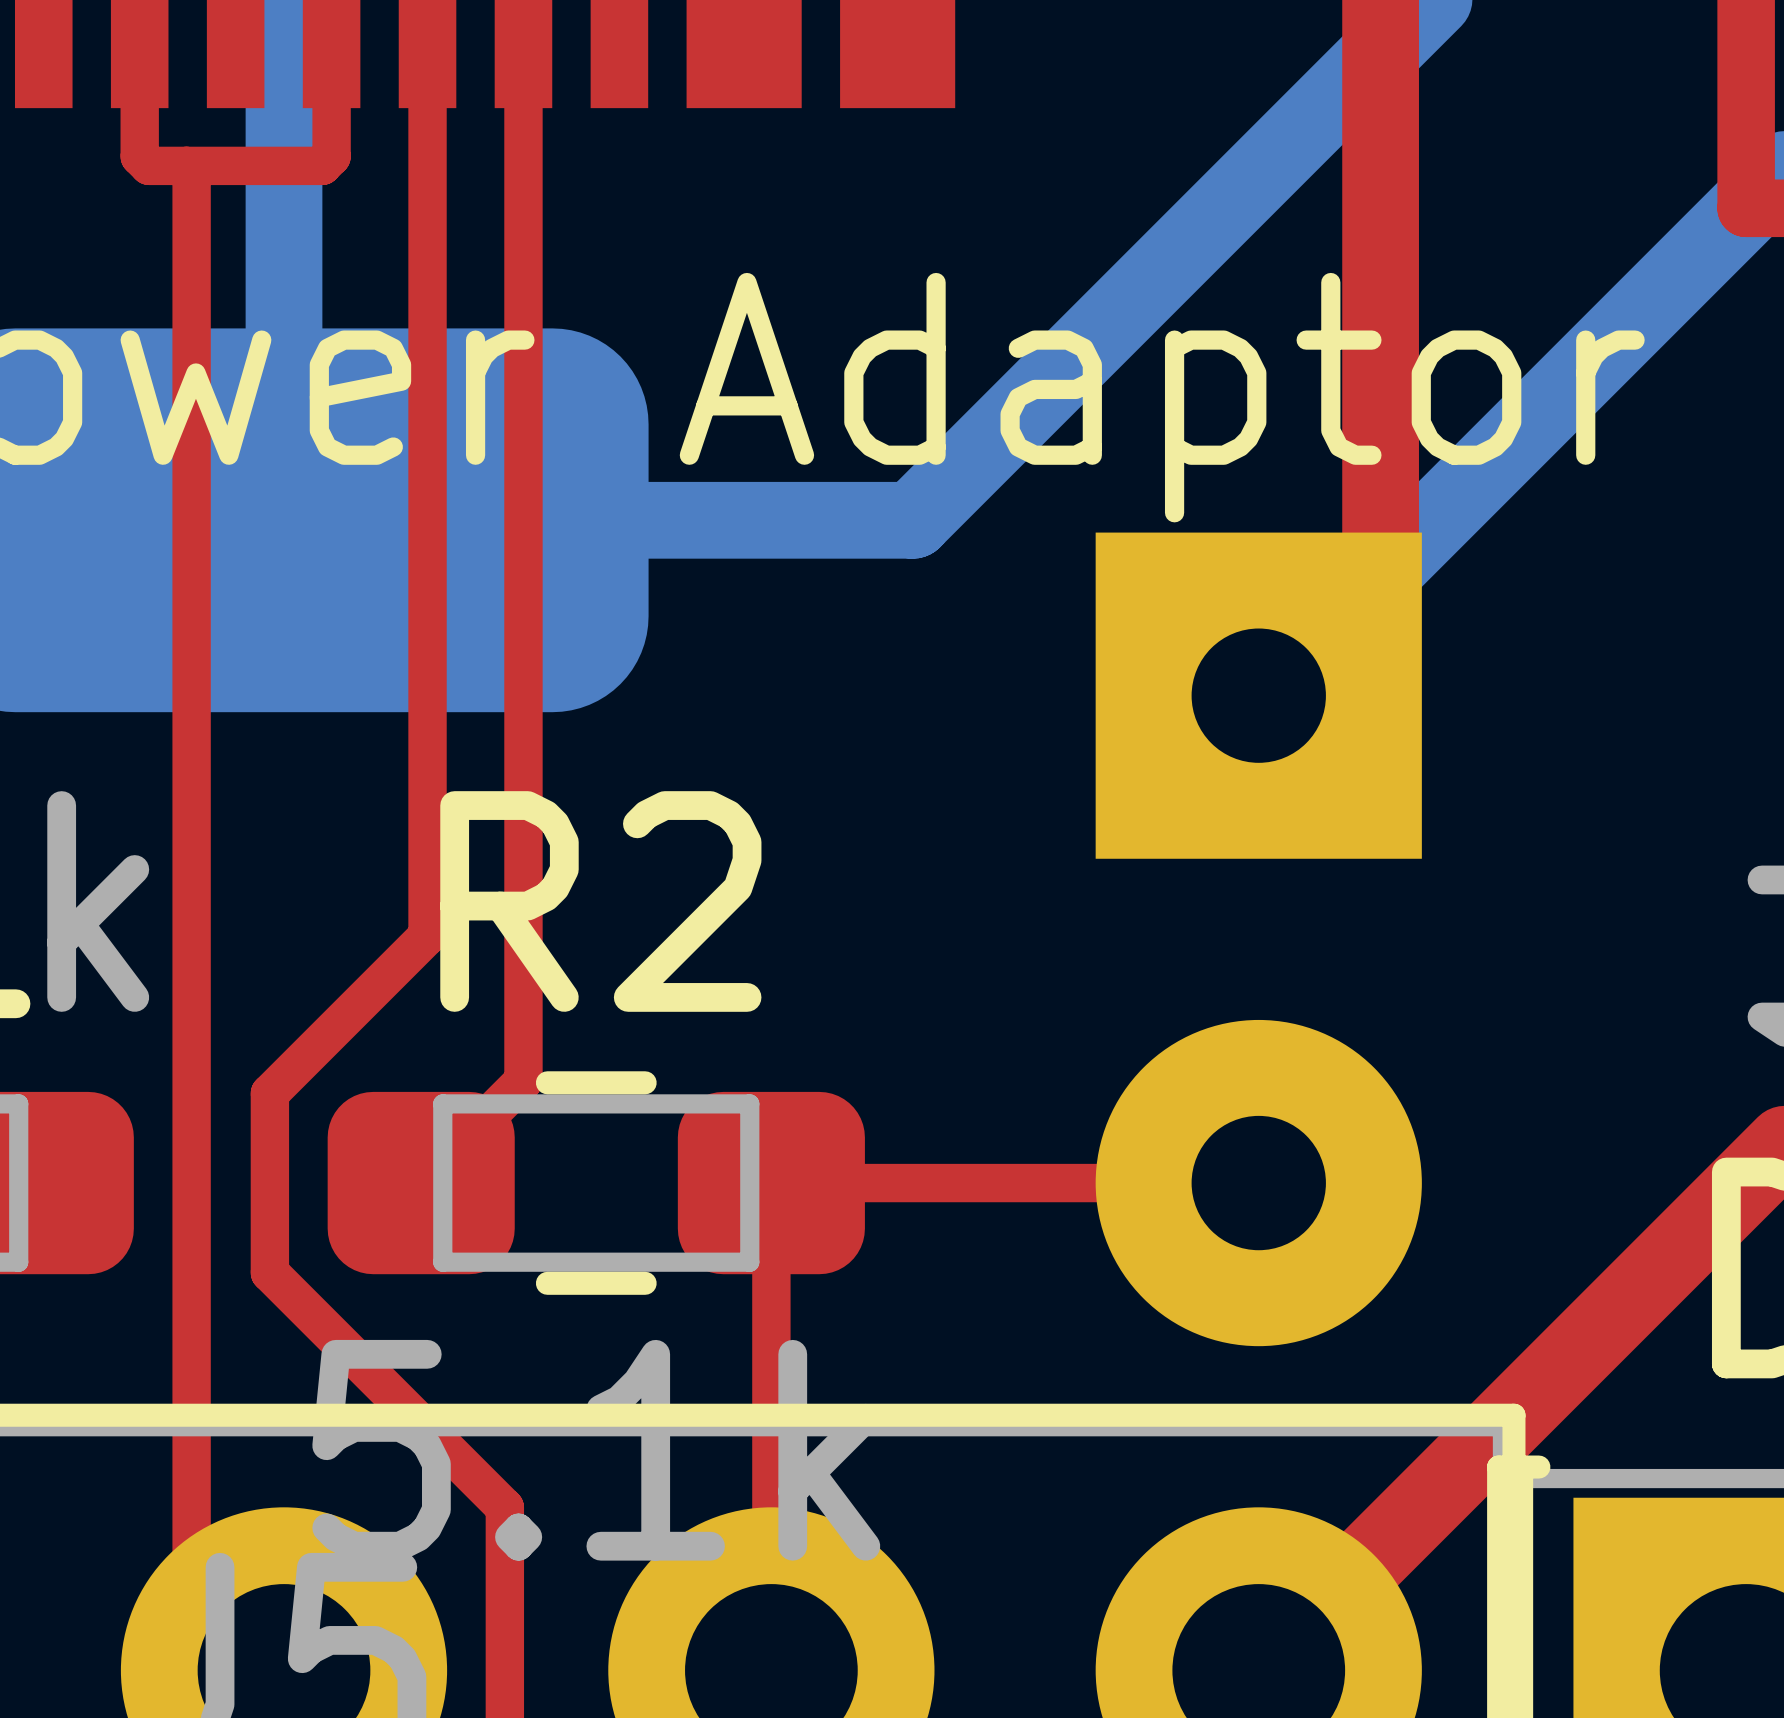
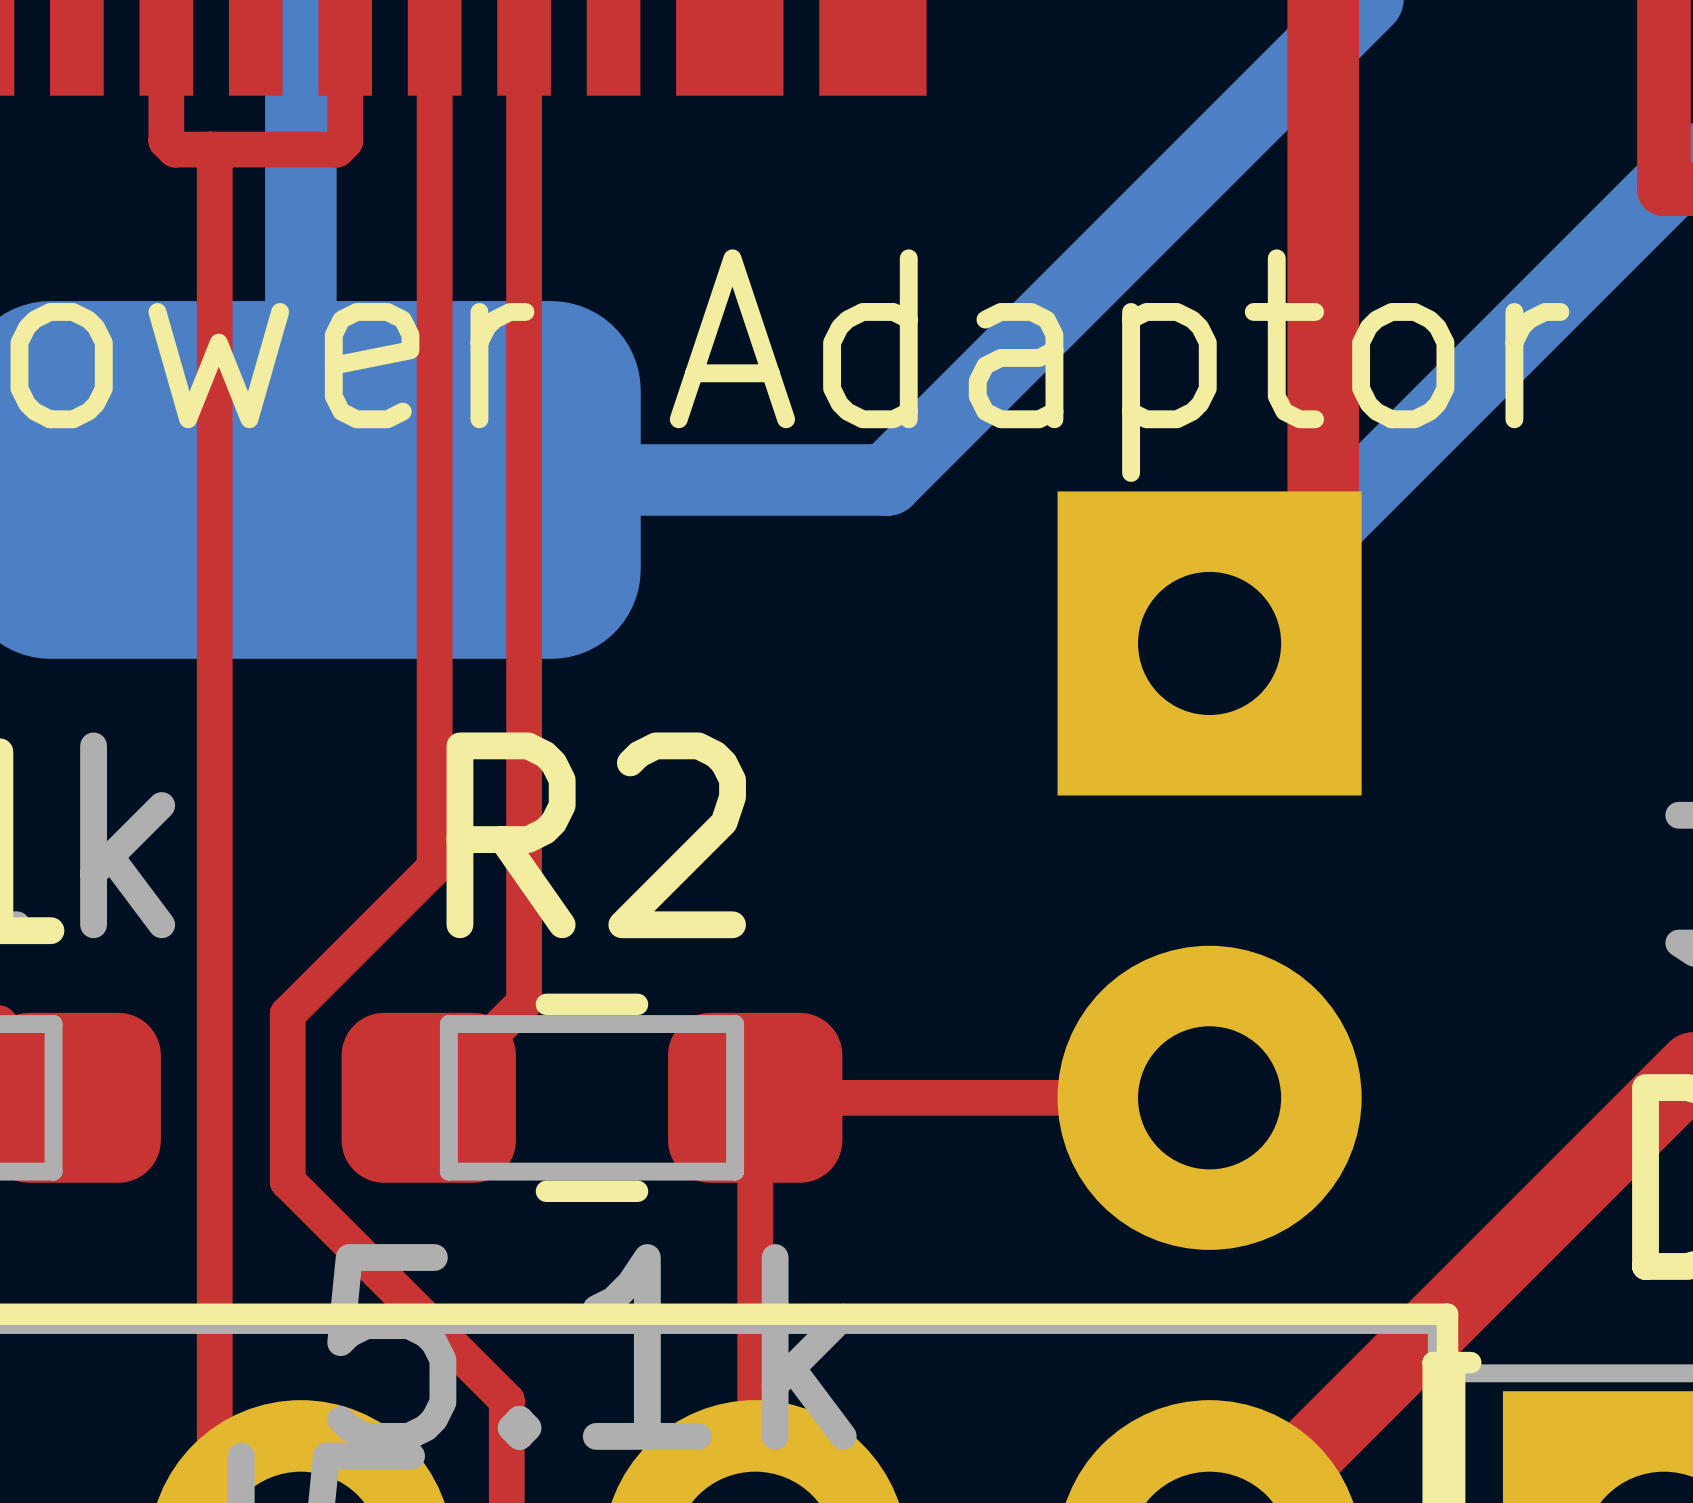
part footprint: [1095, 532, 1422, 1347] -> [1057, 491, 1362, 1250]

